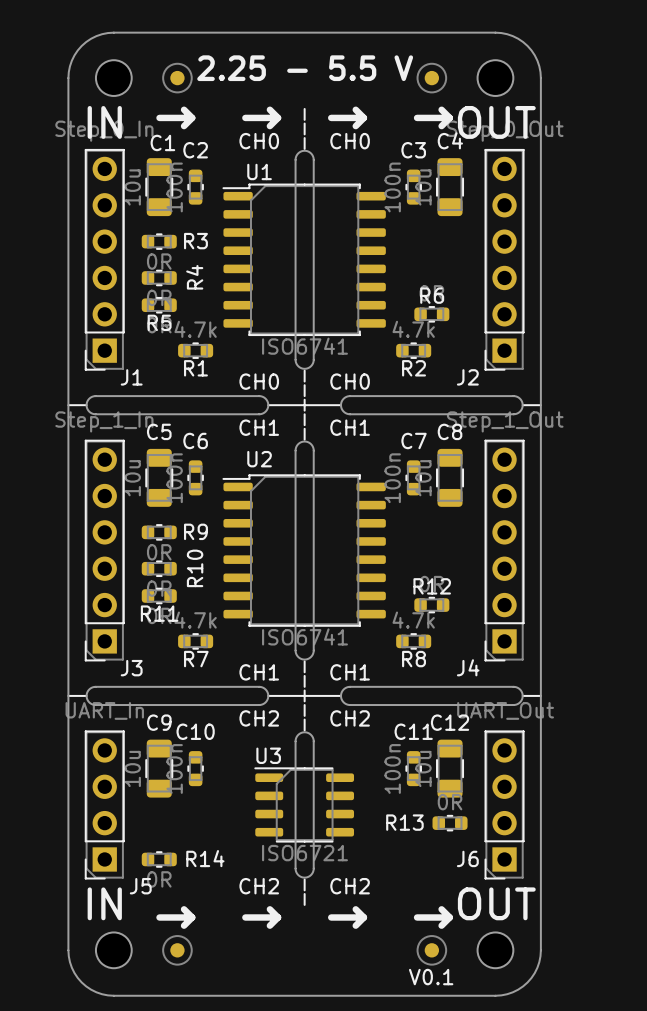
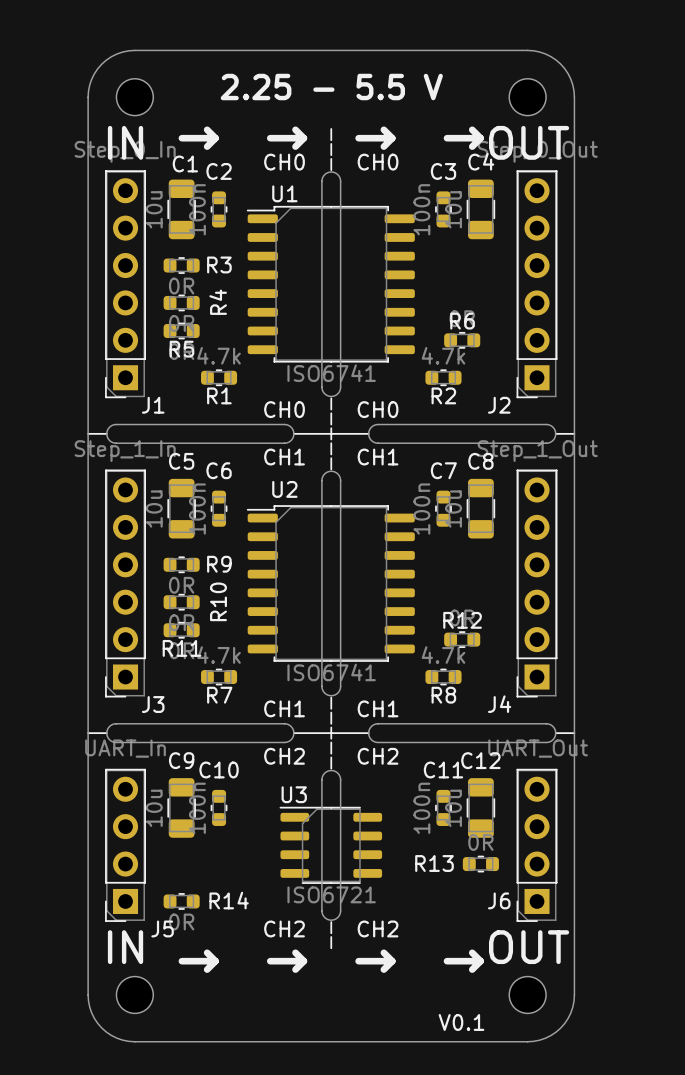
part: (177, 78) -> none
part: (431, 78) -> none
part: (177, 950) -> none
part: (431, 950) -> none

